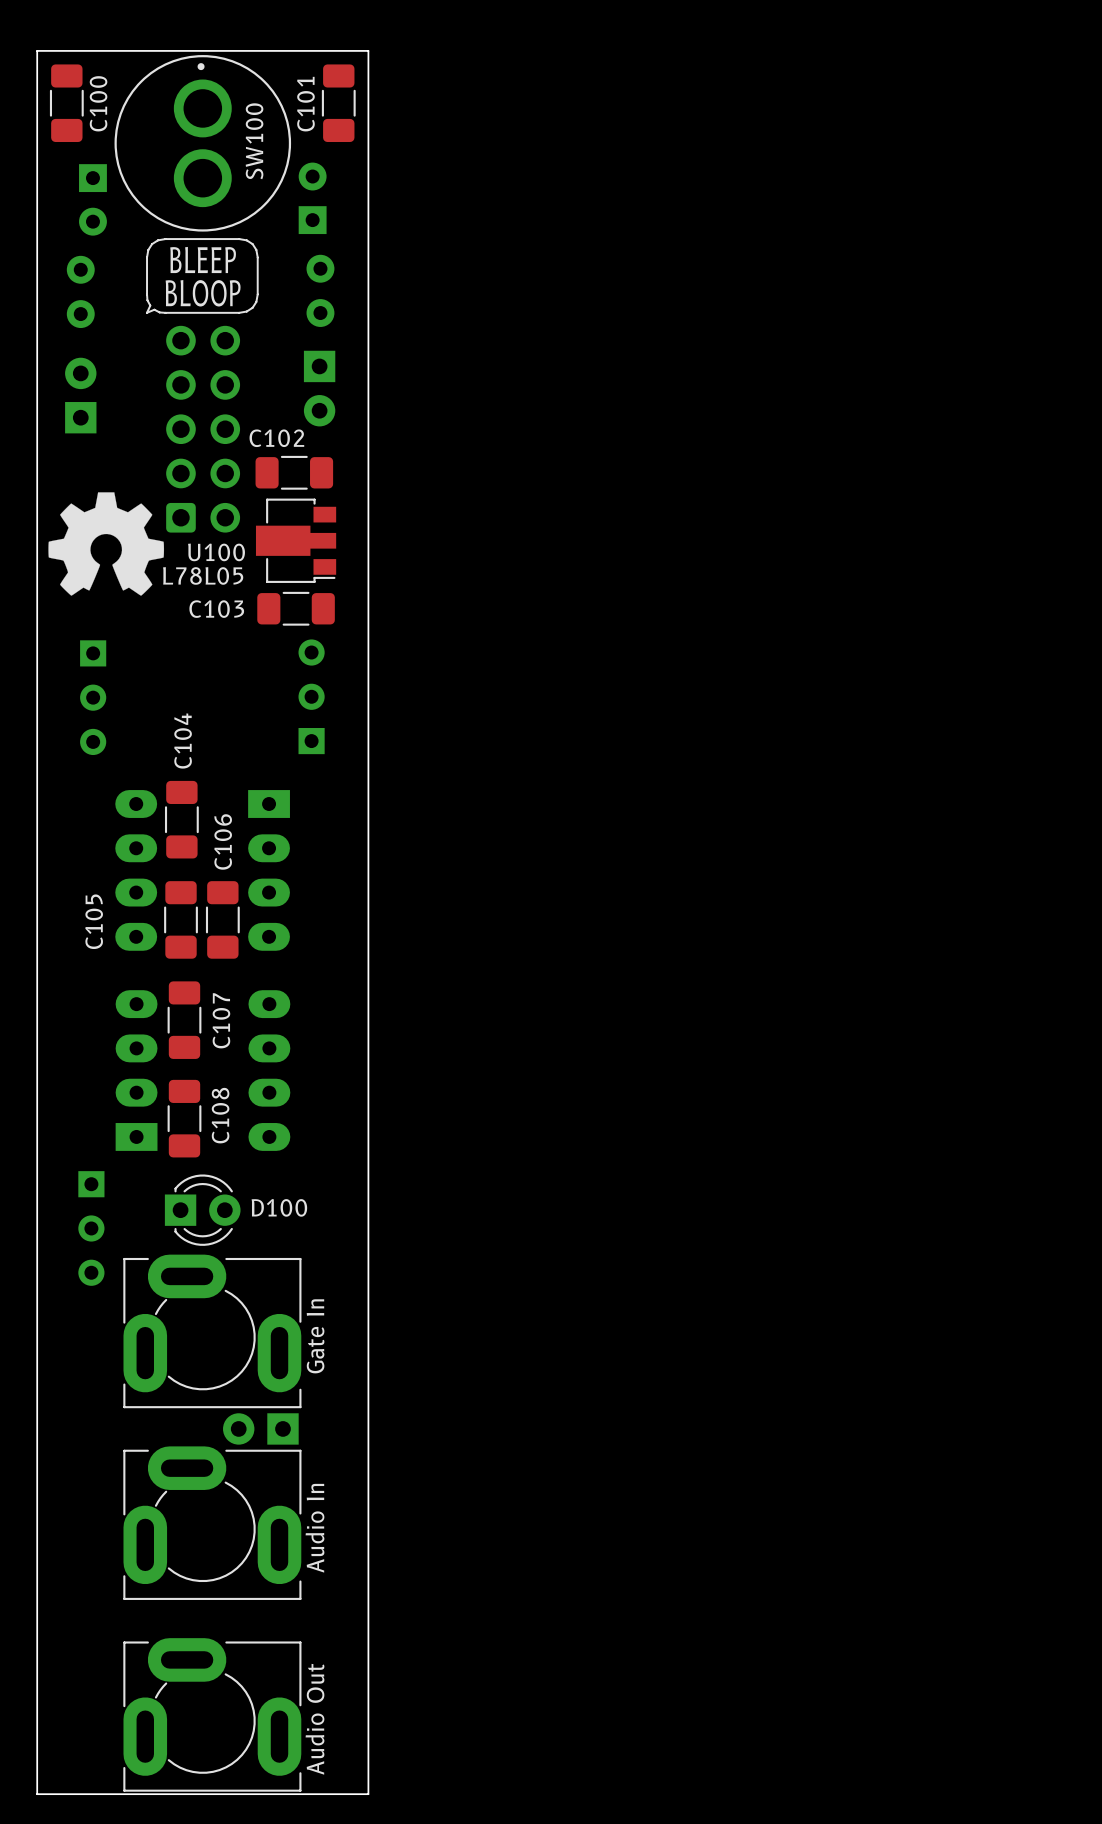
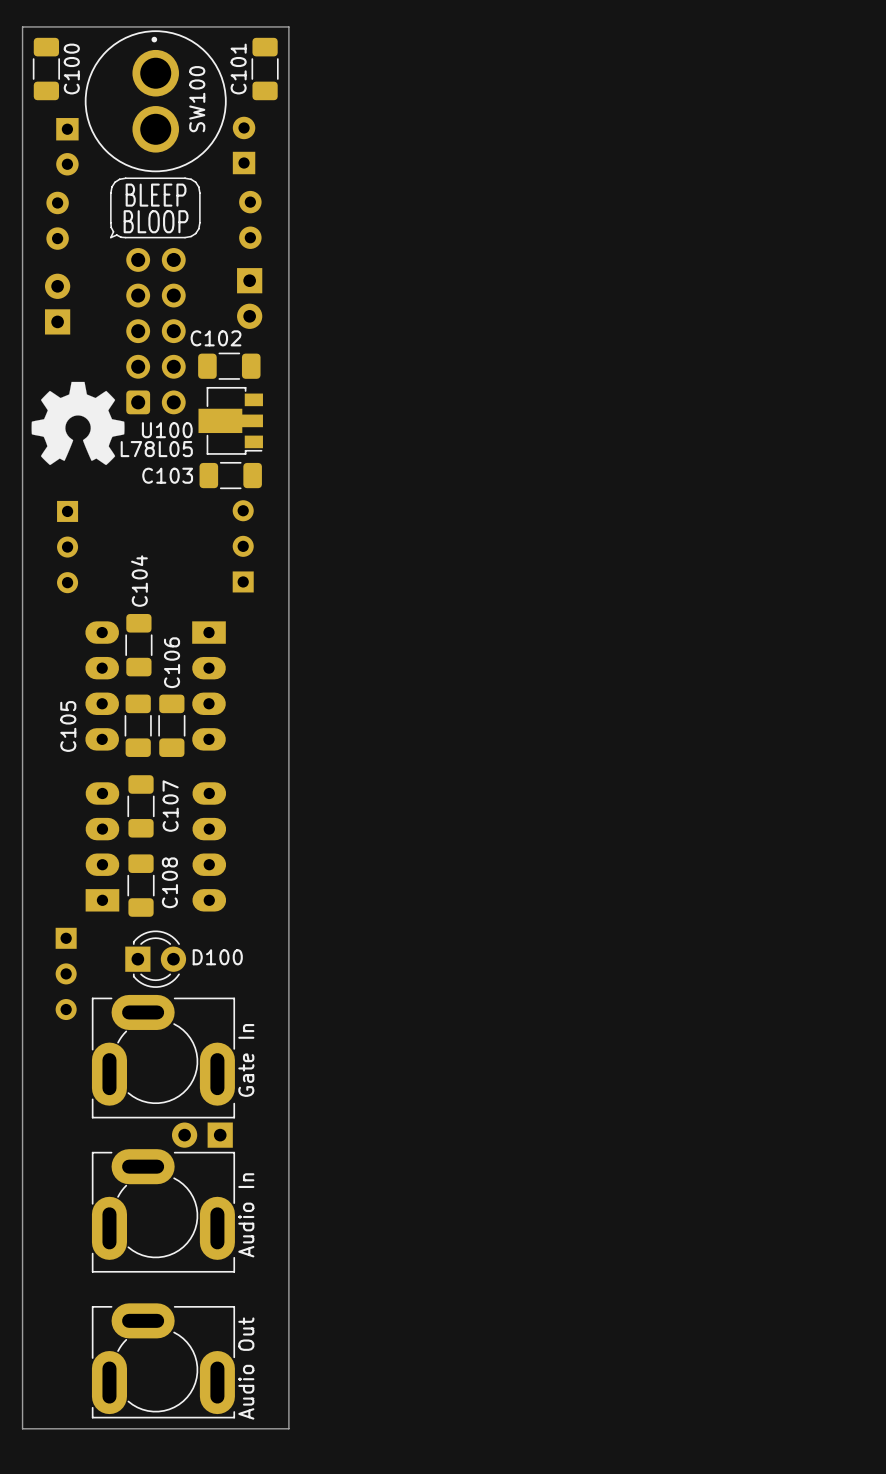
part footprint: [123, 1638, 302, 1792] -> [91, 1303, 236, 1419]

